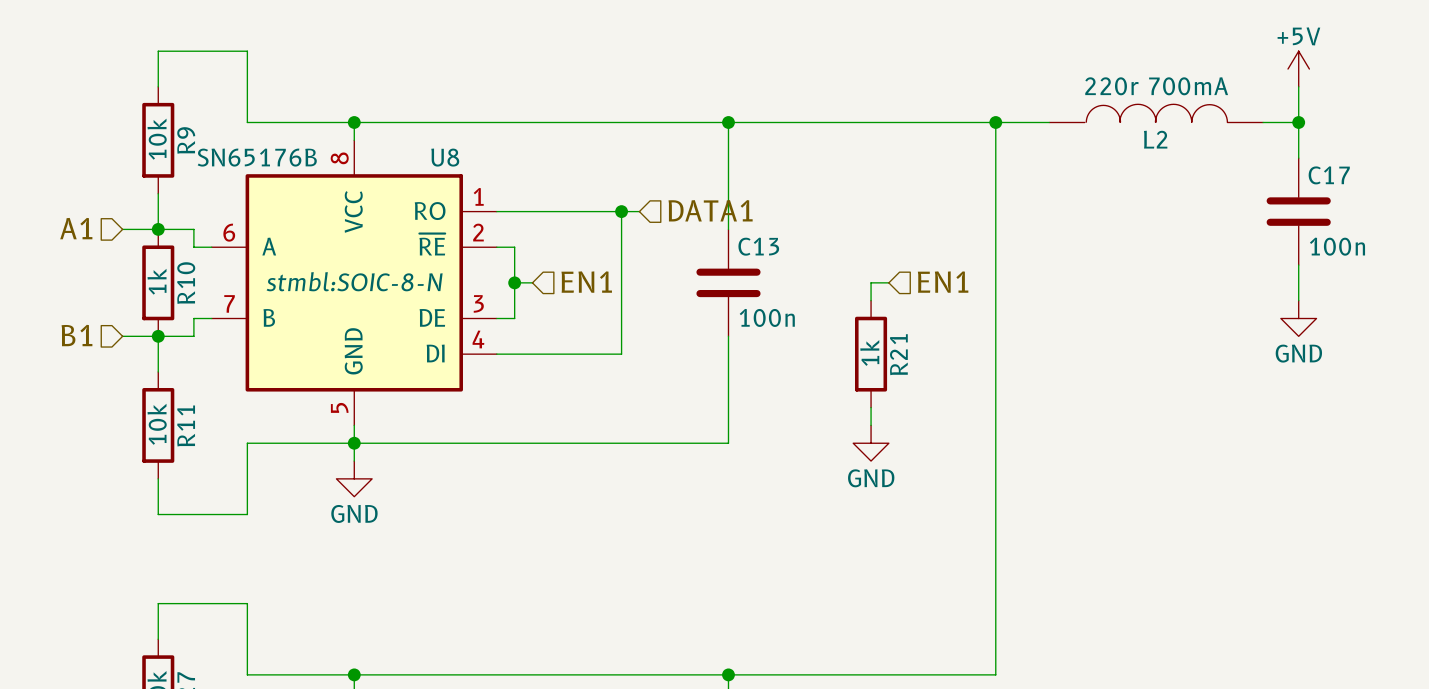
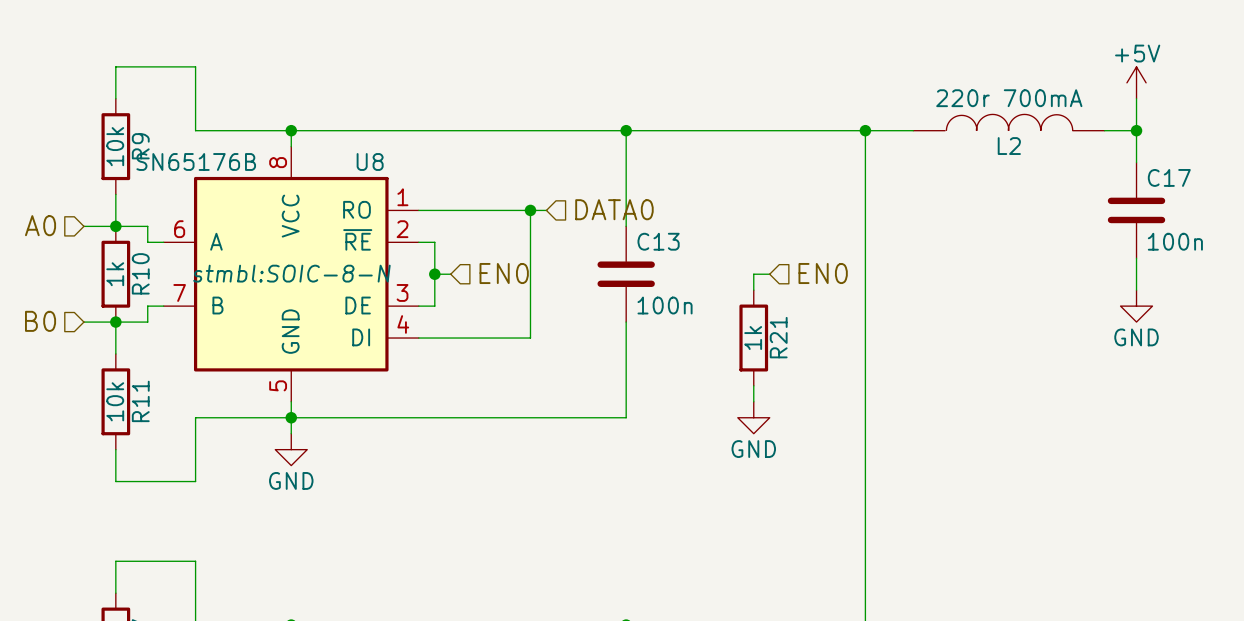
hierarchical label: DATA1 (710, 210) -> DATA0 (614, 209)
hierarchical label: A1 (76, 228) -> A0 (40, 225)
hierarchical label: EN1 (586, 282) -> EN0 (504, 273)
hierarchical label: EN1 (943, 282) -> EN0 (823, 273)
hierarchical label: B1 (76, 335) -> B0 (40, 321)

